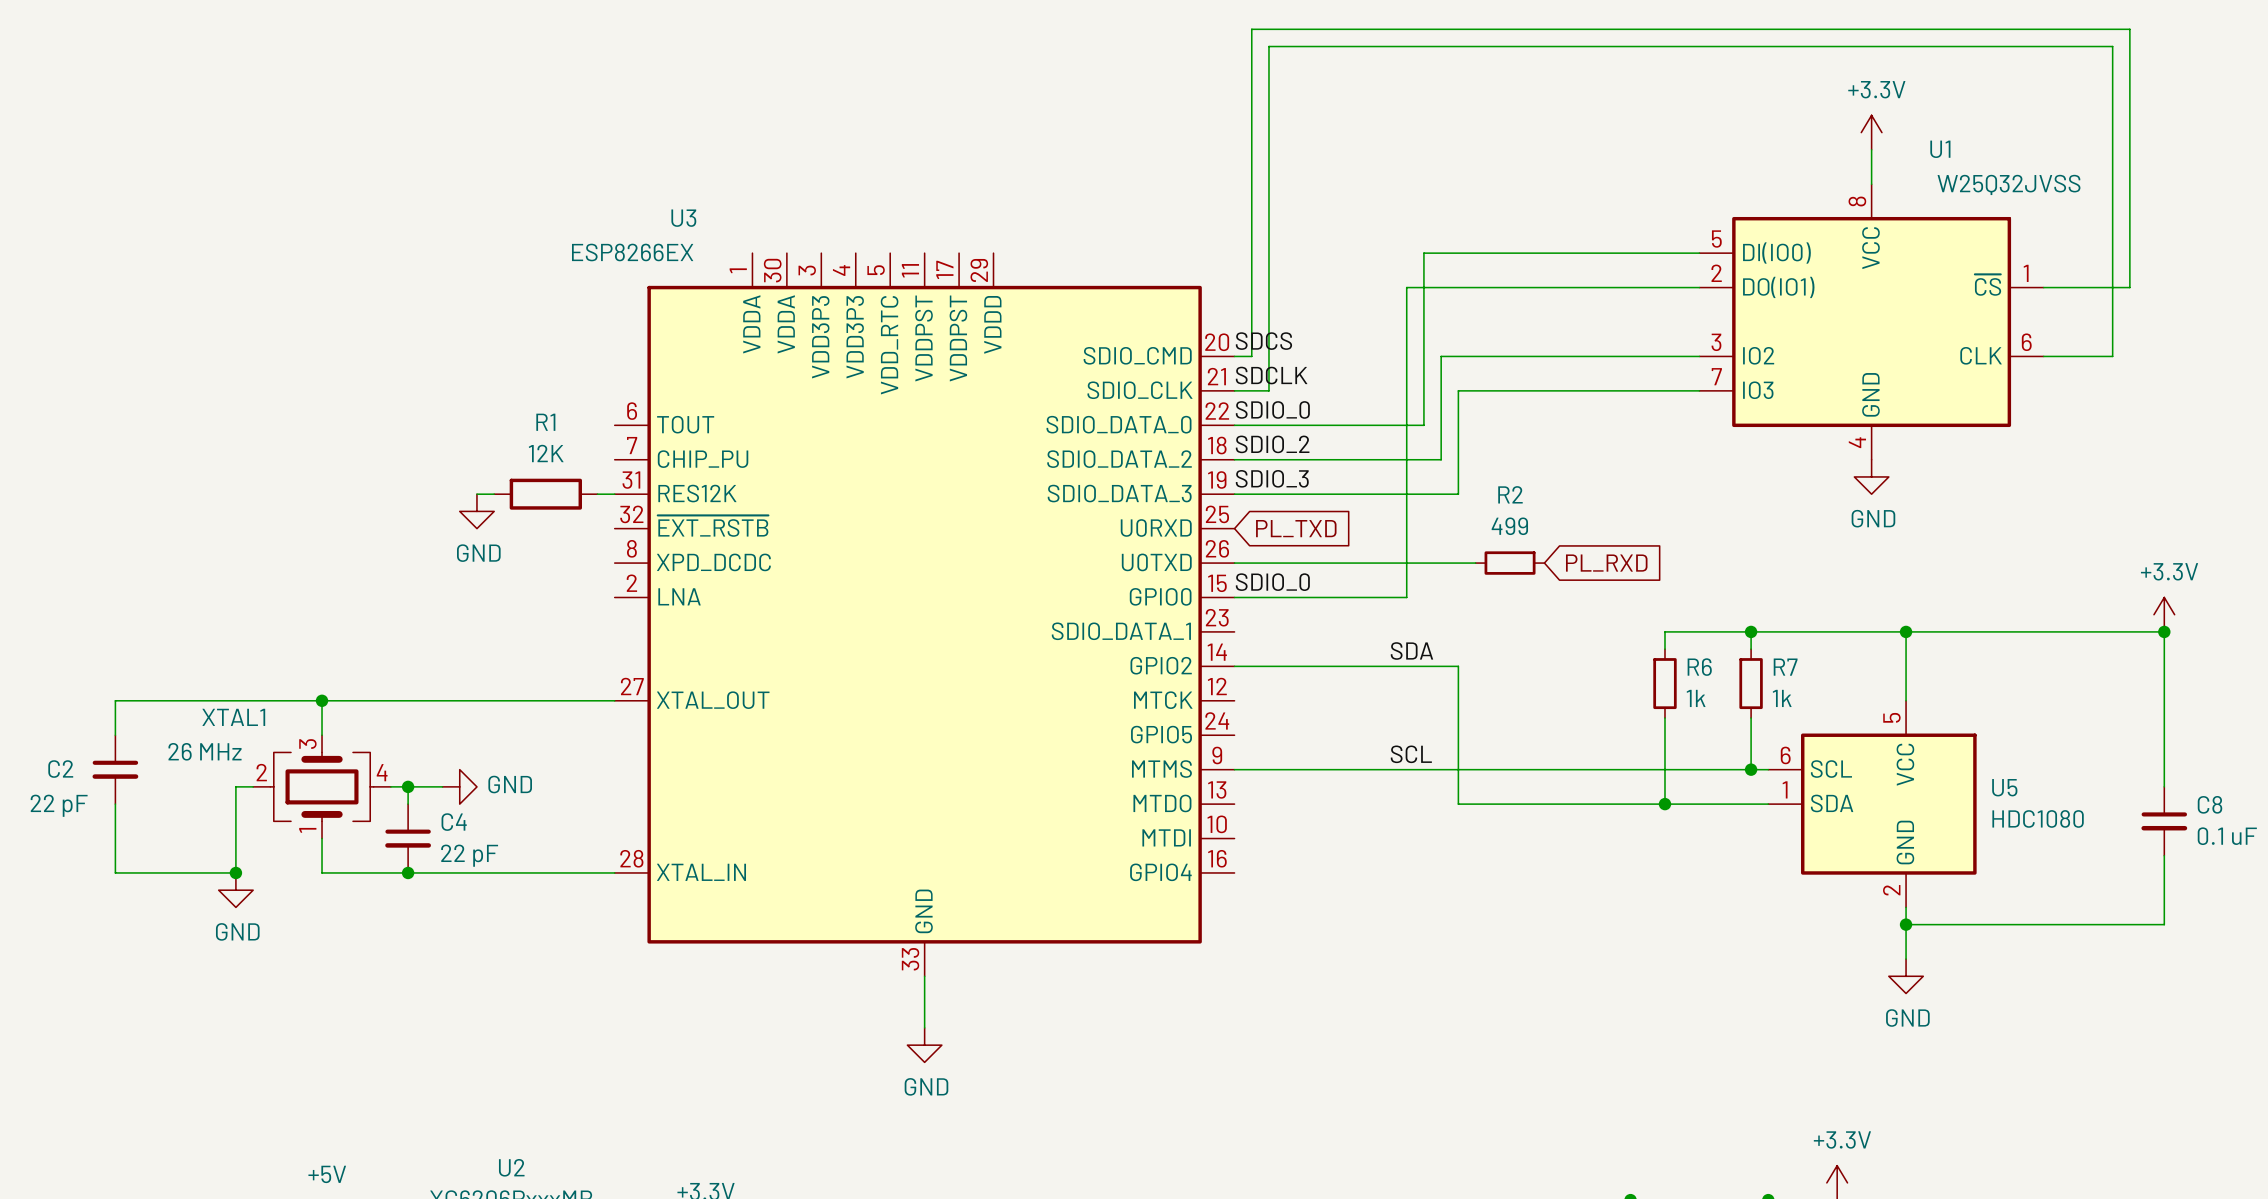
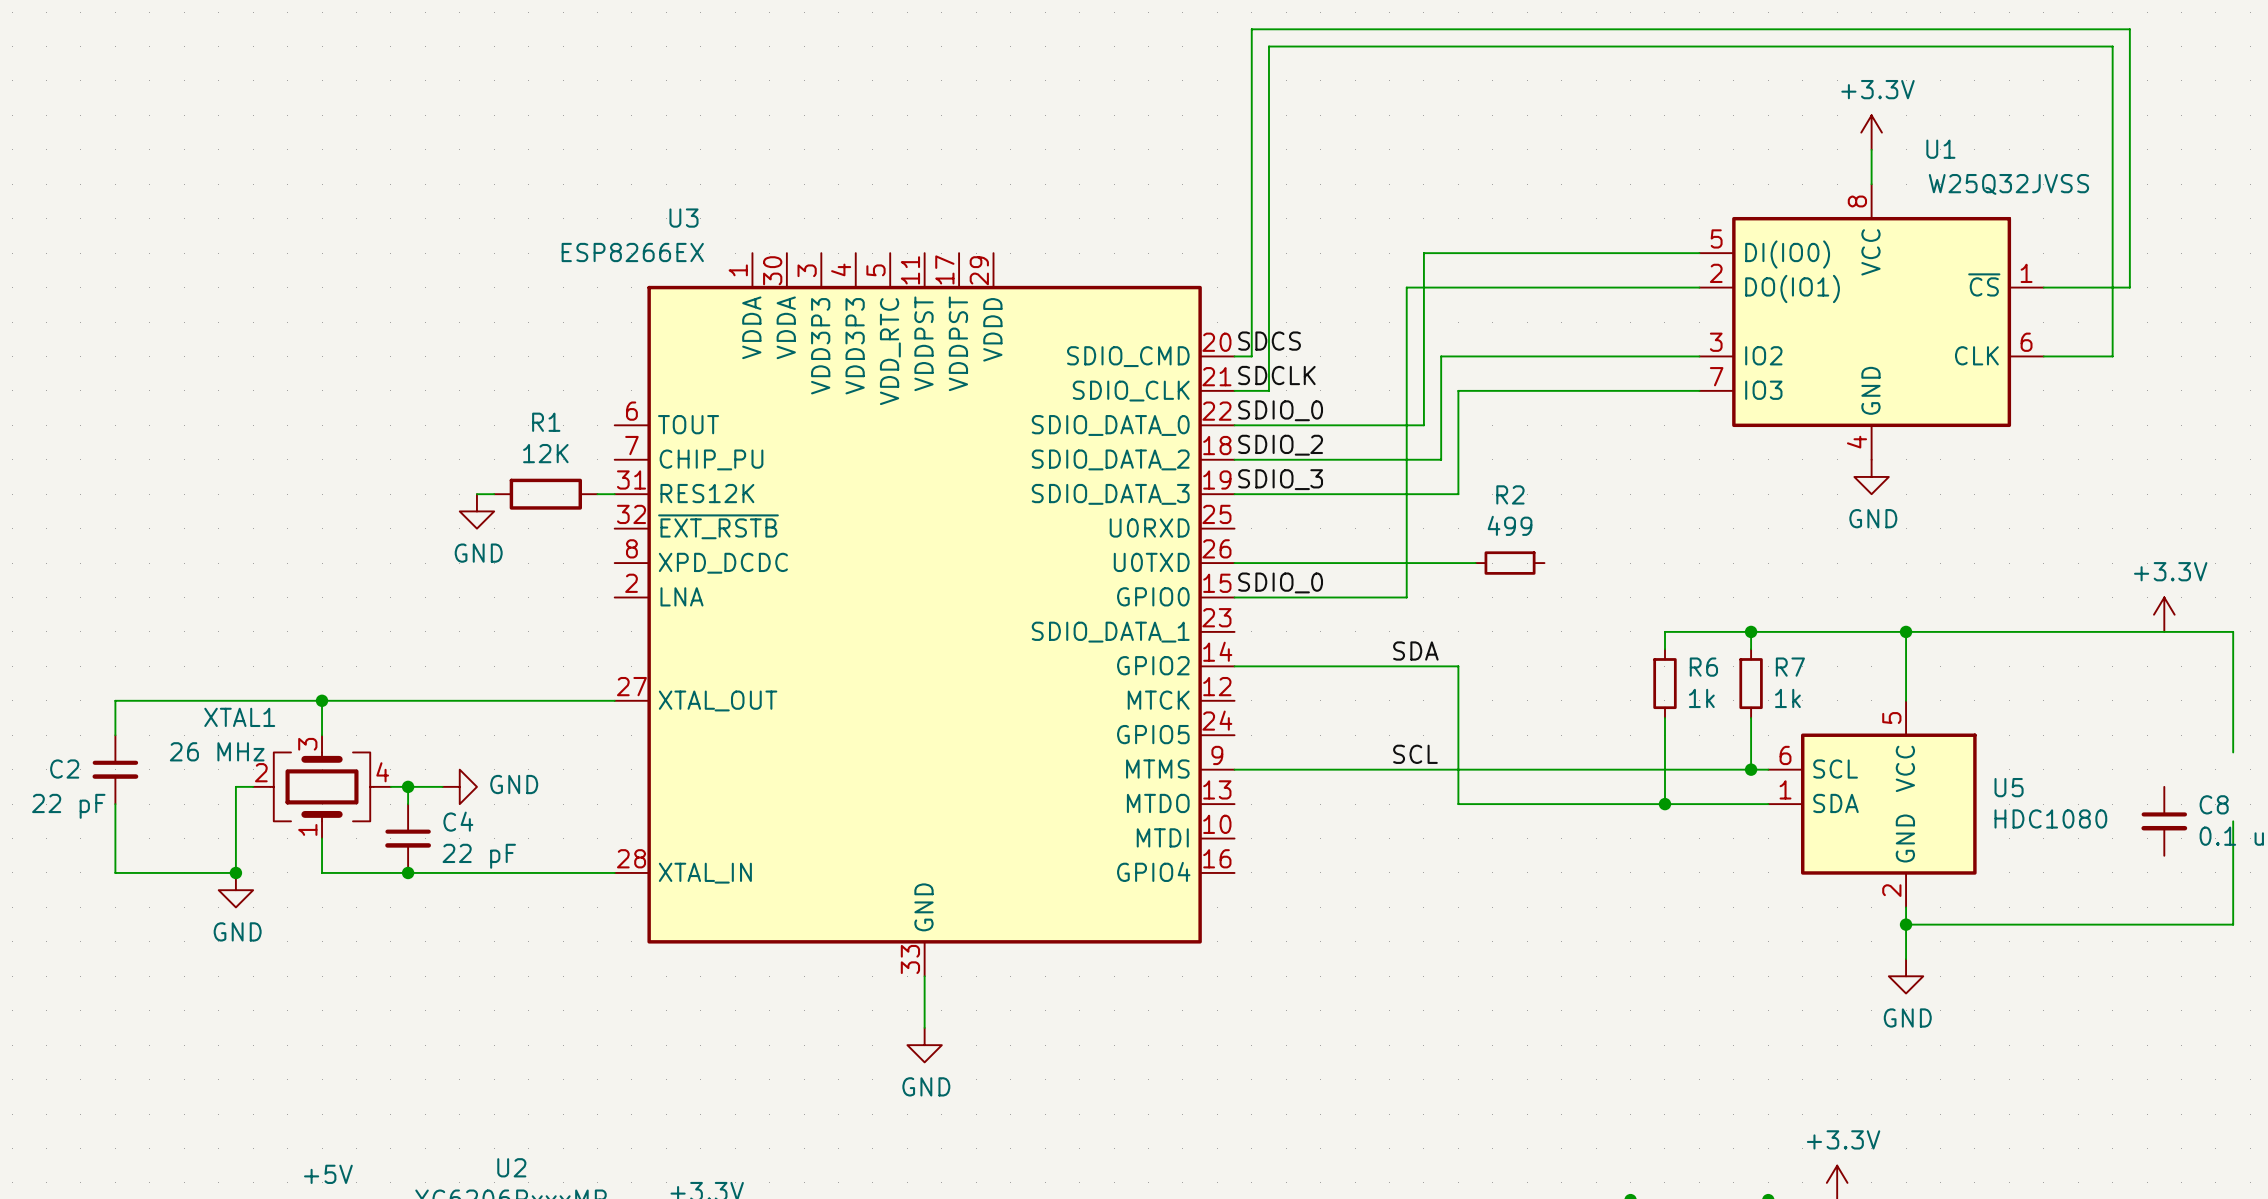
global label: PL_TXD (1296, 528) -> none
global label: PL_RXD (1606, 563) -> none
wire: (2164, 631) (2164, 786) -> (2164, 631) (2233, 631) (2233, 752)
junction: (2164, 631) -> none
wire: (2164, 855) (2164, 924) -> (2233, 821) (2233, 924) (2164, 924)

